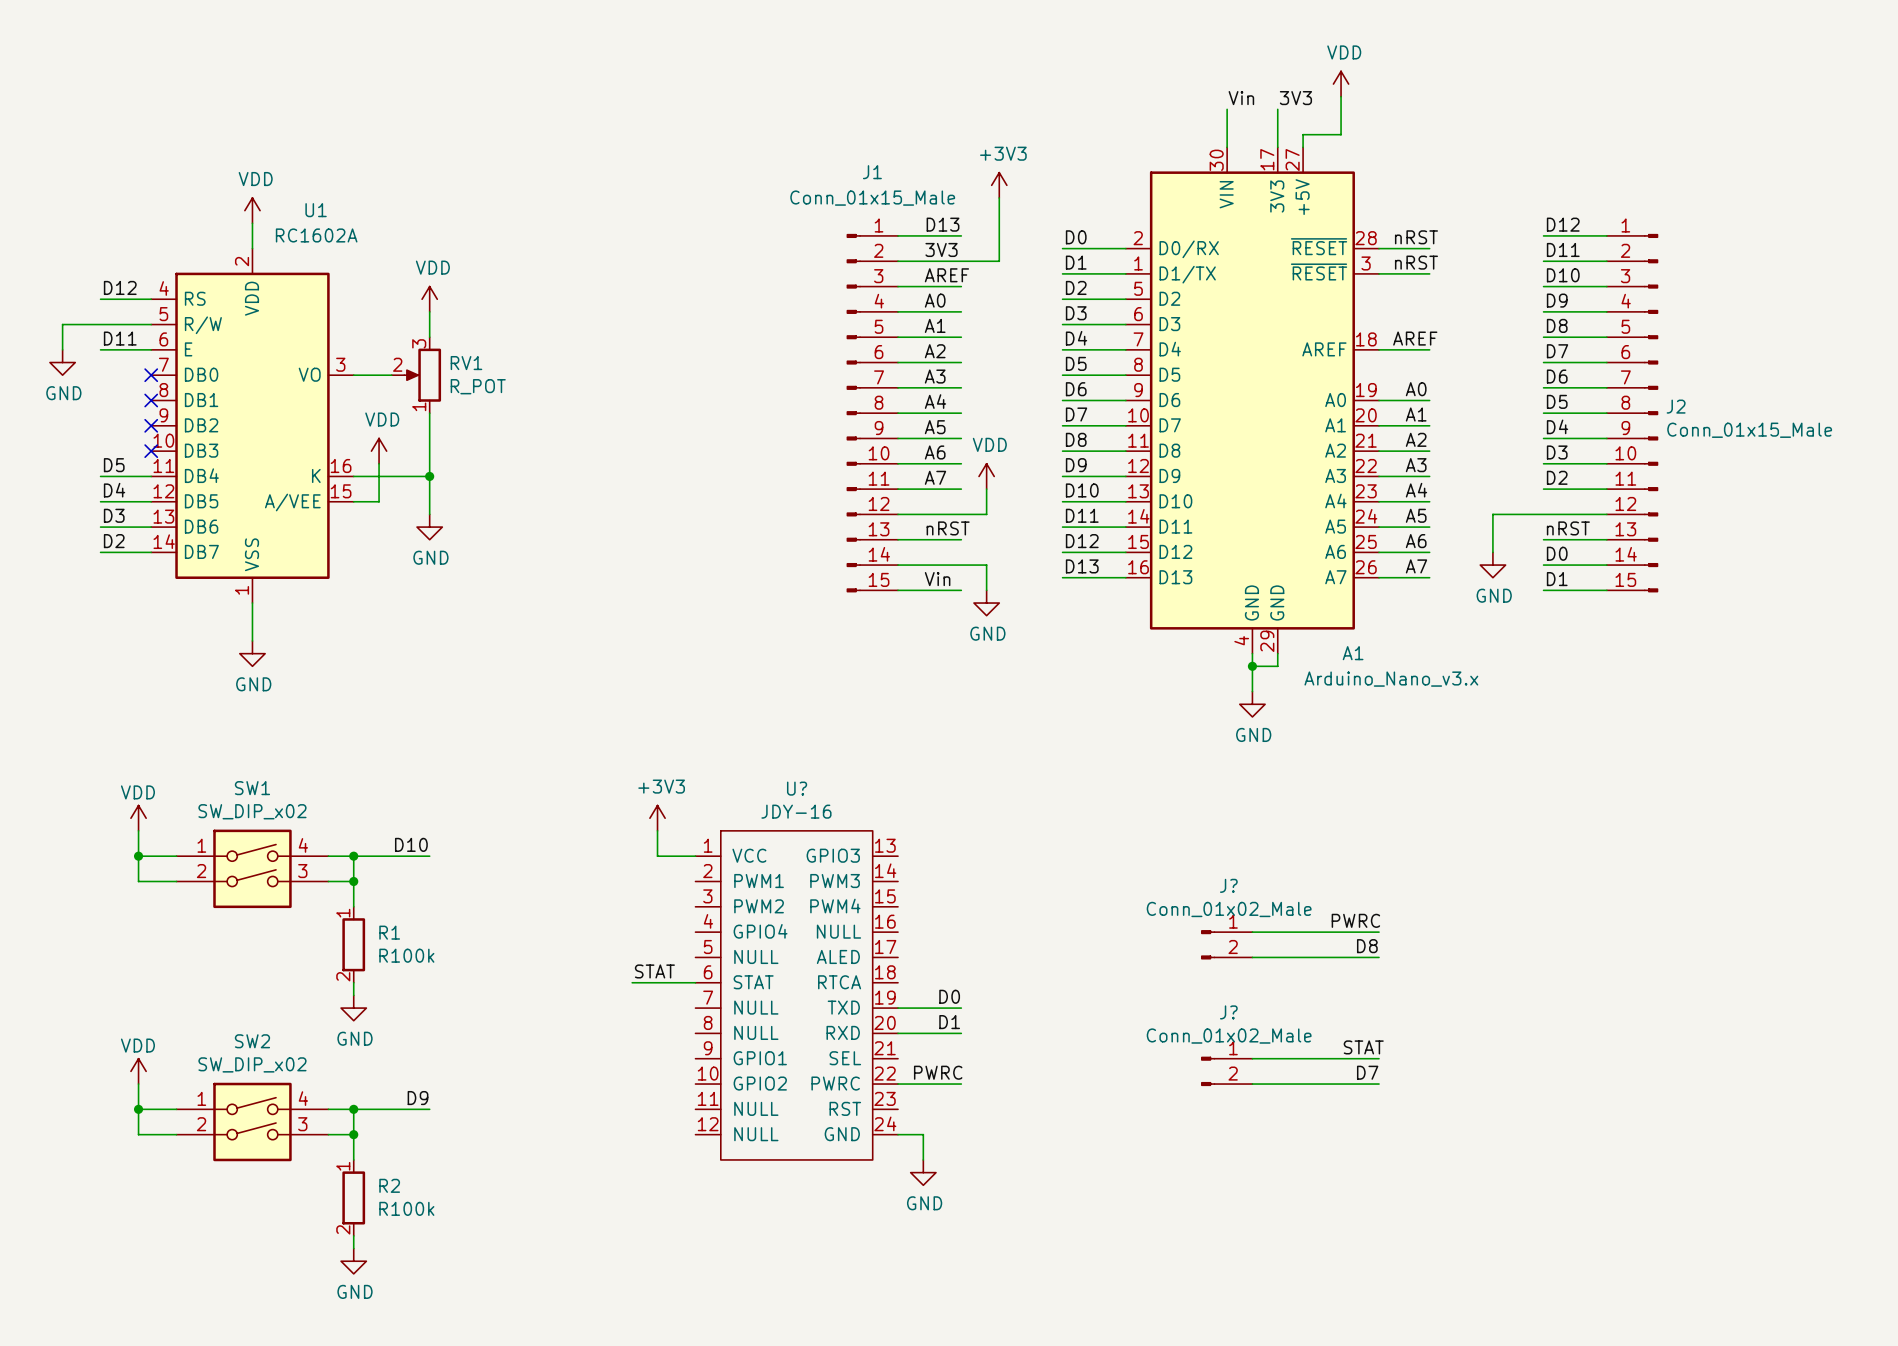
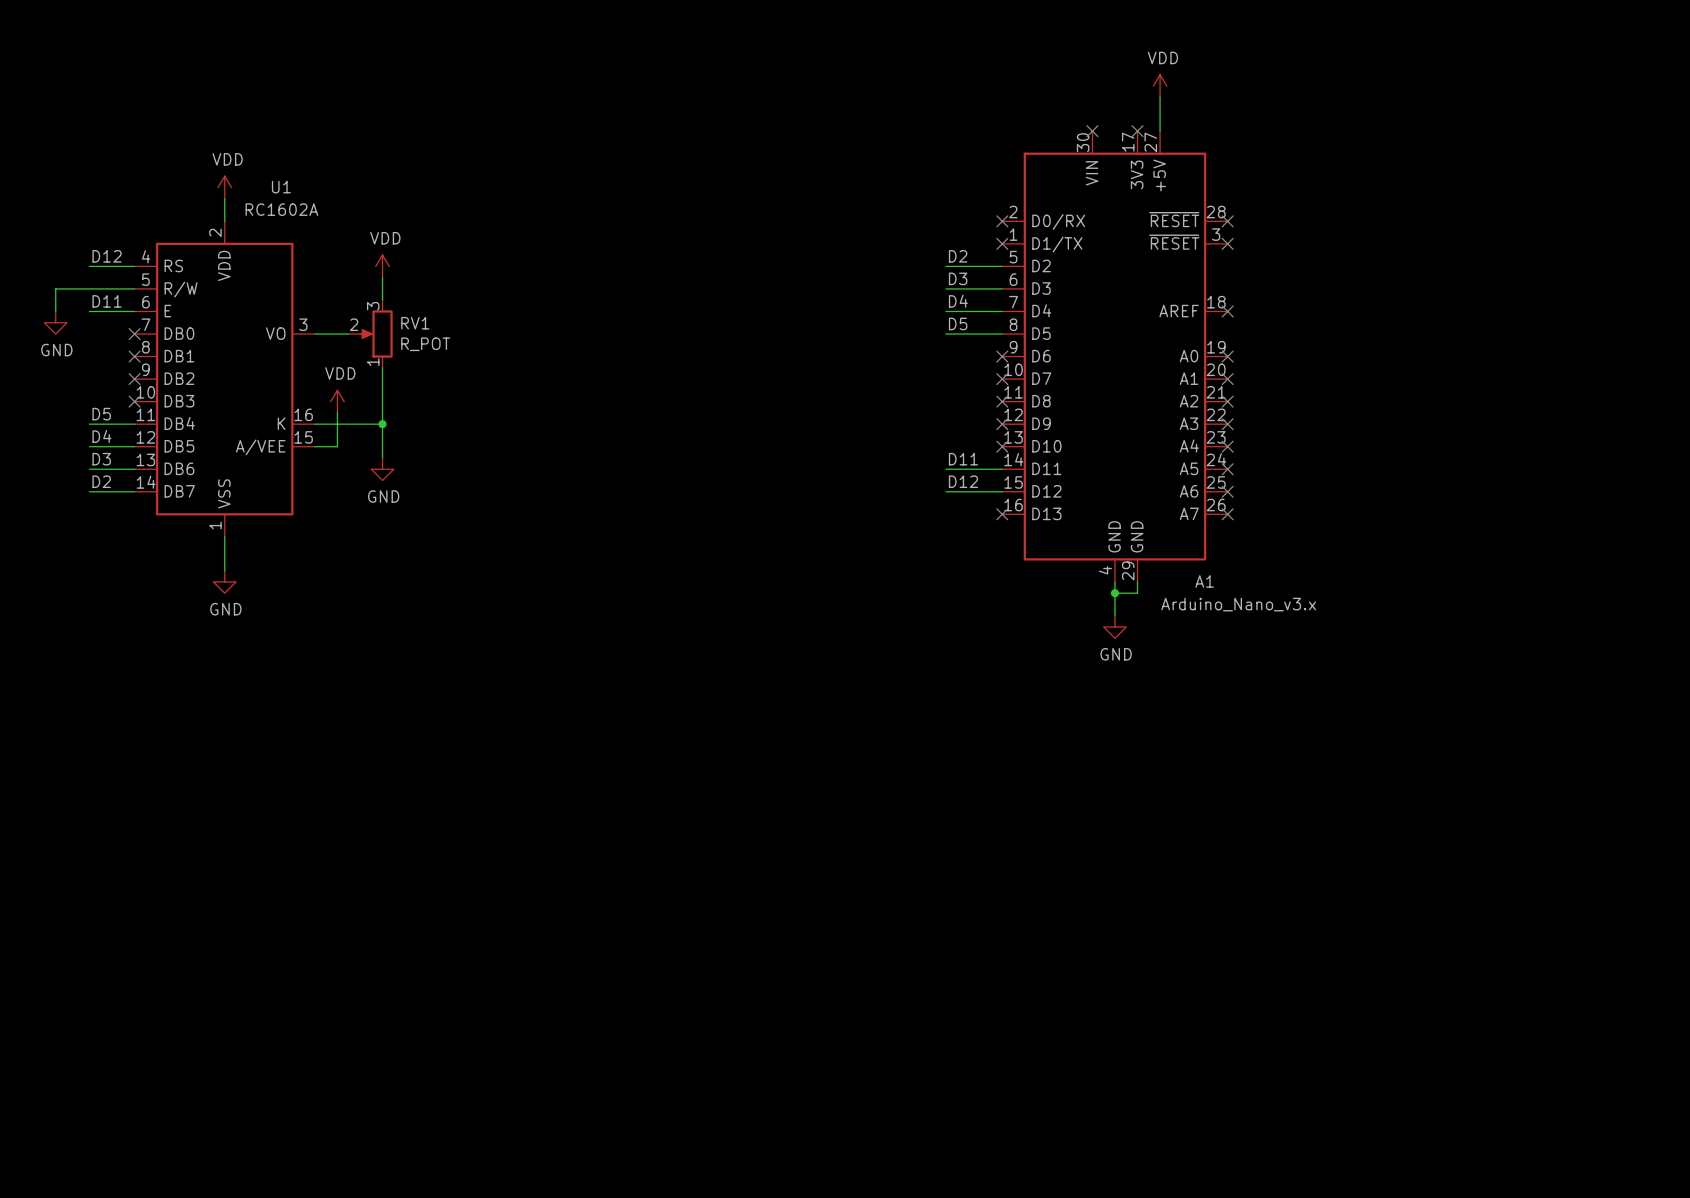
power symbol position: VDD (1341, 84) -> VDD (1160, 86)
wire: (1341, 96) (1341, 134) (1303, 134) -> (1160, 97) (1160, 119)
label: Vin (1241, 98) -> none
label: 3V3 (1295, 98) -> none
wire: (1227, 109) (1227, 147) -> none
wire: (1277, 109) (1277, 147) -> none
no-connect mark: none -> (1092, 131)
no-connect mark: none -> (1137, 131)
power symbol: +3V3 (999, 185) -> none
wire: (999, 197) (999, 261) (898, 261) -> none
label: D13 (943, 224) -> none
label: D12 (1563, 224) -> none
wire: (898, 235) (961, 235) -> none
wire: (1543, 235) (1606, 235) -> none
label: D0 (1076, 237) -> none
label: nRST (1416, 237) -> none
wire: (1062, 248) (1125, 248) -> none
no-connect mark: none -> (1002, 221)
wire: (1379, 248) (1429, 248) -> none
no-connect mark: none -> (1227, 221)
label: 3V3 (941, 249) -> none
label: D11 (1563, 249) -> none
wire: (1543, 261) (1606, 261) -> none
label: D1 (1076, 262) -> none
label: nRST (1416, 262) -> none
wire: (1062, 273) (1125, 273) -> none
no-connect mark: none -> (1002, 243)
wire: (1379, 273) (1429, 273) -> none
no-connect mark: none -> (1227, 243)
label: AREF (946, 275) -> none
label: D10 (1563, 275) -> none
wire: (898, 286) (961, 286) -> none
wire: (1543, 286) (1606, 286) -> none
label: A0 (935, 300) -> none
label: D9 (1557, 300) -> none
wire: (898, 311) (961, 311) -> none
wire: (1543, 311) (1606, 311) -> none
label: A1 (935, 325) -> none
label: D8 (1557, 325) -> none
wire: (898, 337) (961, 337) -> none
wire: (1543, 337) (1606, 337) -> none
label: AREF (1415, 338) -> none
wire: (1379, 349) (1429, 349) -> none
no-connect mark: none -> (1227, 311)
label: A2 (935, 351) -> none
label: D7 (1557, 351) -> none
wire: (898, 362) (961, 362) -> none
wire: (1543, 362) (1606, 362) -> none
label: A3 (935, 376) -> none
label: D6 (1557, 376) -> none
wire: (898, 387) (961, 387) -> none
wire: (1543, 387) (1606, 387) -> none
label: D6 (1076, 389) -> none
label: A0 (1416, 389) -> none
wire: (1062, 400) (1125, 400) -> none
no-connect mark: none -> (1002, 356)
wire: (1379, 400) (1429, 400) -> none
no-connect mark: none -> (1227, 356)
label: A4 (935, 401) -> none
label: D5 (1557, 401) -> none
J1: Conn_01x15_Male (872, 413) -> none
wire: (898, 413) (961, 413) -> none
wire: (1543, 413) (1606, 413) -> none
J2: Conn_01x15_Male (1632, 413) -> none
label: D7 (1076, 414) -> none
label: A1 (1416, 414) -> none
wire: (1062, 425) (1125, 425) -> none
no-connect mark: none -> (1002, 379)
wire: (1379, 425) (1429, 425) -> none
no-connect mark: none -> (1227, 379)
label: D4 (1557, 426) -> none
label: A5 (935, 427) -> none
wire: (898, 438) (961, 438) -> none
wire: (1543, 438) (1606, 438) -> none
label: D8 (1076, 439) -> none
label: A2 (1416, 439) -> none
wire: (1062, 451) (1125, 451) -> none
no-connect mark: none -> (1002, 401)
wire: (1379, 451) (1429, 451) -> none
no-connect mark: none -> (1227, 401)
label: A6 (935, 452) -> none
label: D3 (1557, 452) -> none
wire: (898, 463) (961, 463) -> none
wire: (1543, 463) (1606, 463) -> none
label: D9 (1076, 465) -> none
label: A3 (1416, 465) -> none
power symbol: VDD (986, 476) -> none
wire: (1062, 476) (1125, 476) -> none
no-connect mark: none -> (1002, 424)
wire: (1379, 476) (1429, 476) -> none
no-connect mark: none -> (1227, 424)
label: A7 (935, 477) -> none
label: D2 (1557, 477) -> none
wire: (898, 489) (961, 489) -> none
wire: (986, 489) (986, 514) (898, 514) -> none
wire: (1543, 489) (1606, 489) -> none
label: D10 (1082, 490) -> none
label: A4 (1416, 490) -> none
wire: (1062, 501) (1125, 501) -> none
no-connect mark: none -> (1002, 446)
wire: (1379, 501) (1429, 501) -> none
no-connect mark: none -> (1227, 446)
wire: (1606, 514) (1492, 514) (1492, 552) -> none
label: A5 (1416, 515) -> none
wire: (1379, 527) (1429, 527) -> none
no-connect mark: none -> (1227, 469)
label: nRST (948, 528) -> none
label: nRST (1568, 528) -> none
wire: (898, 539) (961, 539) -> none
wire: (1543, 539) (1606, 539) -> none
label: A6 (1416, 541) -> none
wire: (1379, 552) (1429, 552) -> none
no-connect mark: none -> (1227, 491)
label: D0 (1557, 553) -> none
wire: (898, 565) (986, 565) (986, 590) -> none
power symbol: GND (1492, 565) -> none
wire: (1543, 565) (1606, 565) -> none
label: D13 (1082, 566) -> none
label: A7 (1416, 566) -> none
wire: (1062, 577) (1125, 577) -> none
no-connect mark: none -> (1002, 514)
wire: (1379, 577) (1429, 577) -> none
no-connect mark: none -> (1227, 514)
label: Vin (937, 579) -> none
label: D1 (1557, 579) -> none
wire: (898, 590) (961, 590) -> none
wire: (1543, 590) (1606, 590) -> none
power symbol: GND (986, 603) -> none
power symbol: VDD (138, 818) -> none
power symbol: +3V3 (657, 818) -> none
wire: (138, 830) (138, 881) (176, 881) -> none
wire: (657, 830) (657, 856) (695, 856) -> none
label: D10 (411, 844) -> none
wire: (138, 856) (176, 856) -> none
junction: (138, 856) -> none
wire: (328, 856) (429, 856) -> none
wire: (353, 856) (353, 906) -> none
junction: (353, 856) -> none
SW1: SW_DIP_x02 (252, 868) -> none
wire: (328, 881) (353, 881) -> none
junction: (353, 881) -> none
label: PWRC (1355, 920) -> none
wire: (1252, 932) (1379, 932) -> none
R1: R100k (353, 944) -> none
J?: Conn_01x02_Male (1226, 944) -> none
label: D8 (1367, 946) -> none
wire: (1252, 957) (1379, 957) -> none
label: STAT (654, 971) -> none
wire: (353, 982) (353, 995) -> none
wire: (632, 982) (695, 982) -> none
U?: JDY-16 (796, 995) -> none
label: D0 (949, 996) -> none
power symbol: GND (353, 1008) -> none
wire: (898, 1008) (961, 1008) -> none
label: D1 (949, 1022) -> none
wire: (898, 1033) (961, 1033) -> none
label: STAT (1363, 1047) -> none
wire: (1252, 1058) (1379, 1058) -> none
power symbol: VDD (138, 1071) -> none
J?: Conn_01x02_Male (1226, 1071) -> none
label: PWRC (938, 1072) -> none
label: D7 (1367, 1072) -> none
wire: (138, 1084) (138, 1134) (176, 1134) -> none
wire: (898, 1084) (961, 1084) -> none
wire: (1252, 1084) (1379, 1084) -> none
label: D9 (418, 1098) -> none
wire: (138, 1109) (176, 1109) -> none
junction: (138, 1109) -> none
wire: (328, 1109) (429, 1109) -> none
wire: (353, 1109) (353, 1159) -> none
junction: (353, 1109) -> none
SW2: SW_DIP_x02 (252, 1121) -> none
wire: (328, 1134) (353, 1134) -> none
junction: (353, 1134) -> none
wire: (898, 1134) (923, 1134) (923, 1159) -> none
power symbol: GND (923, 1172) -> none
R2: R100k (353, 1197) -> none
wire: (353, 1235) (353, 1248) -> none
power symbol: GND (353, 1261) -> none

